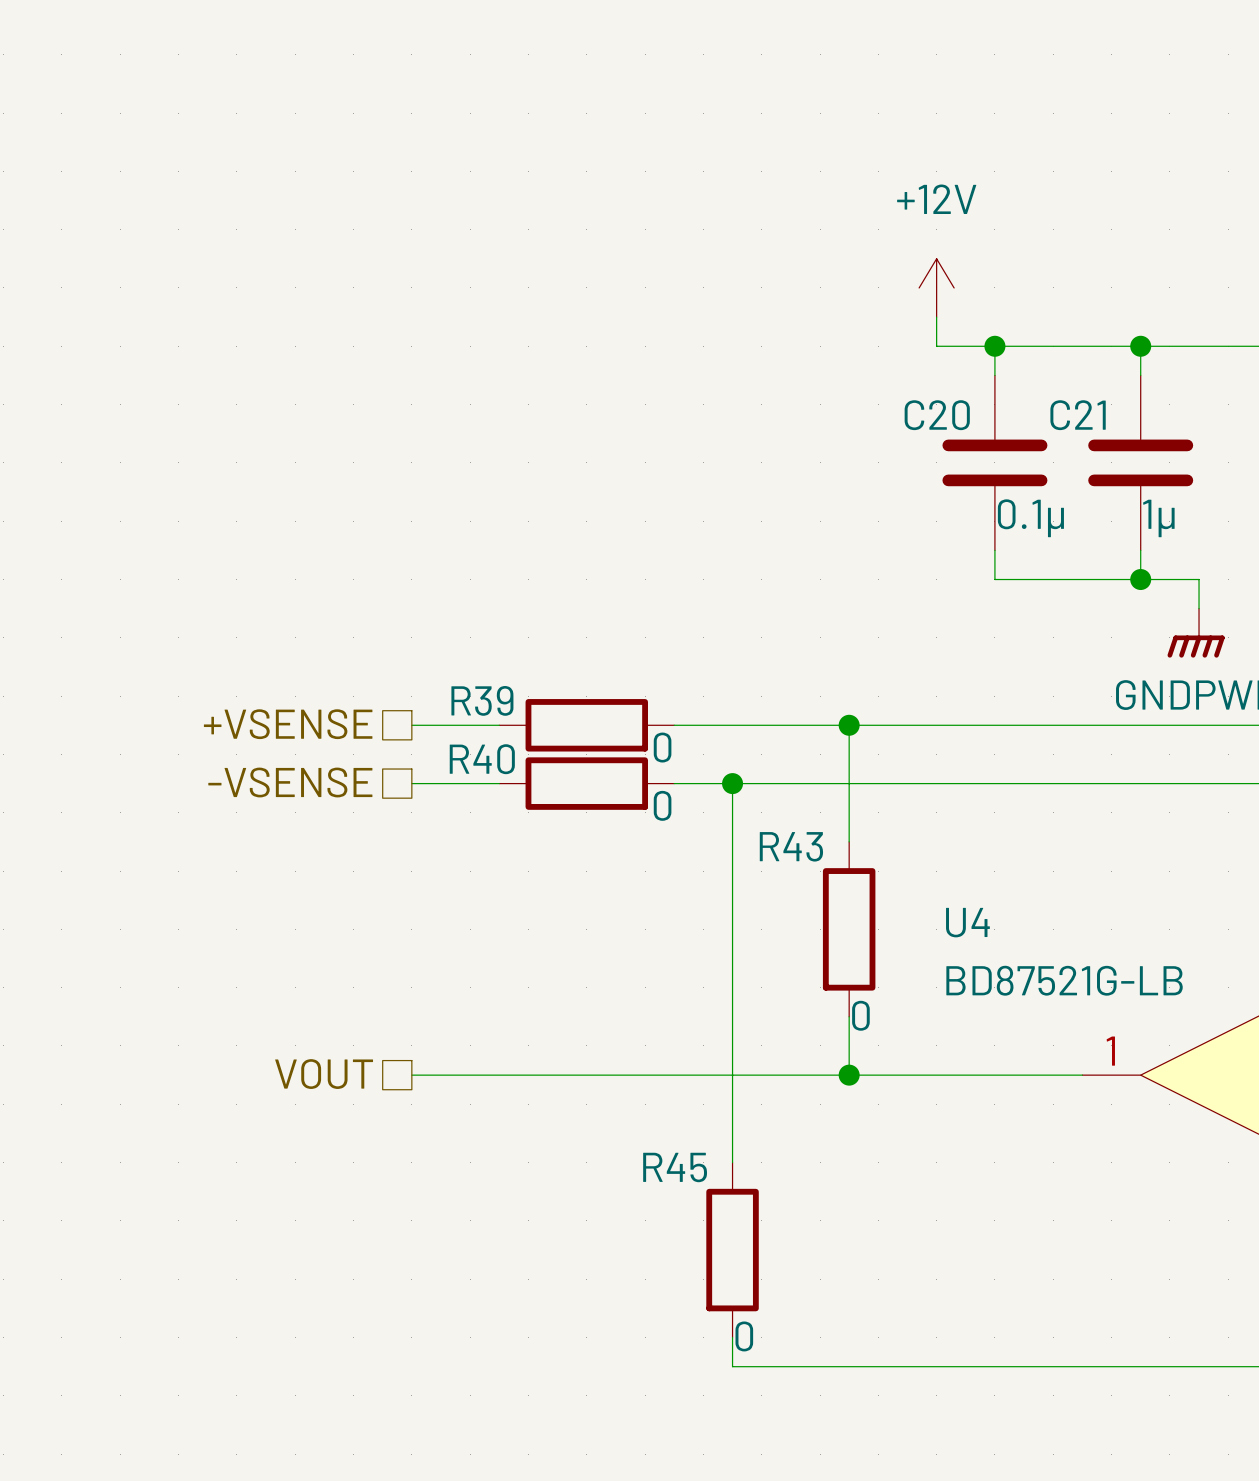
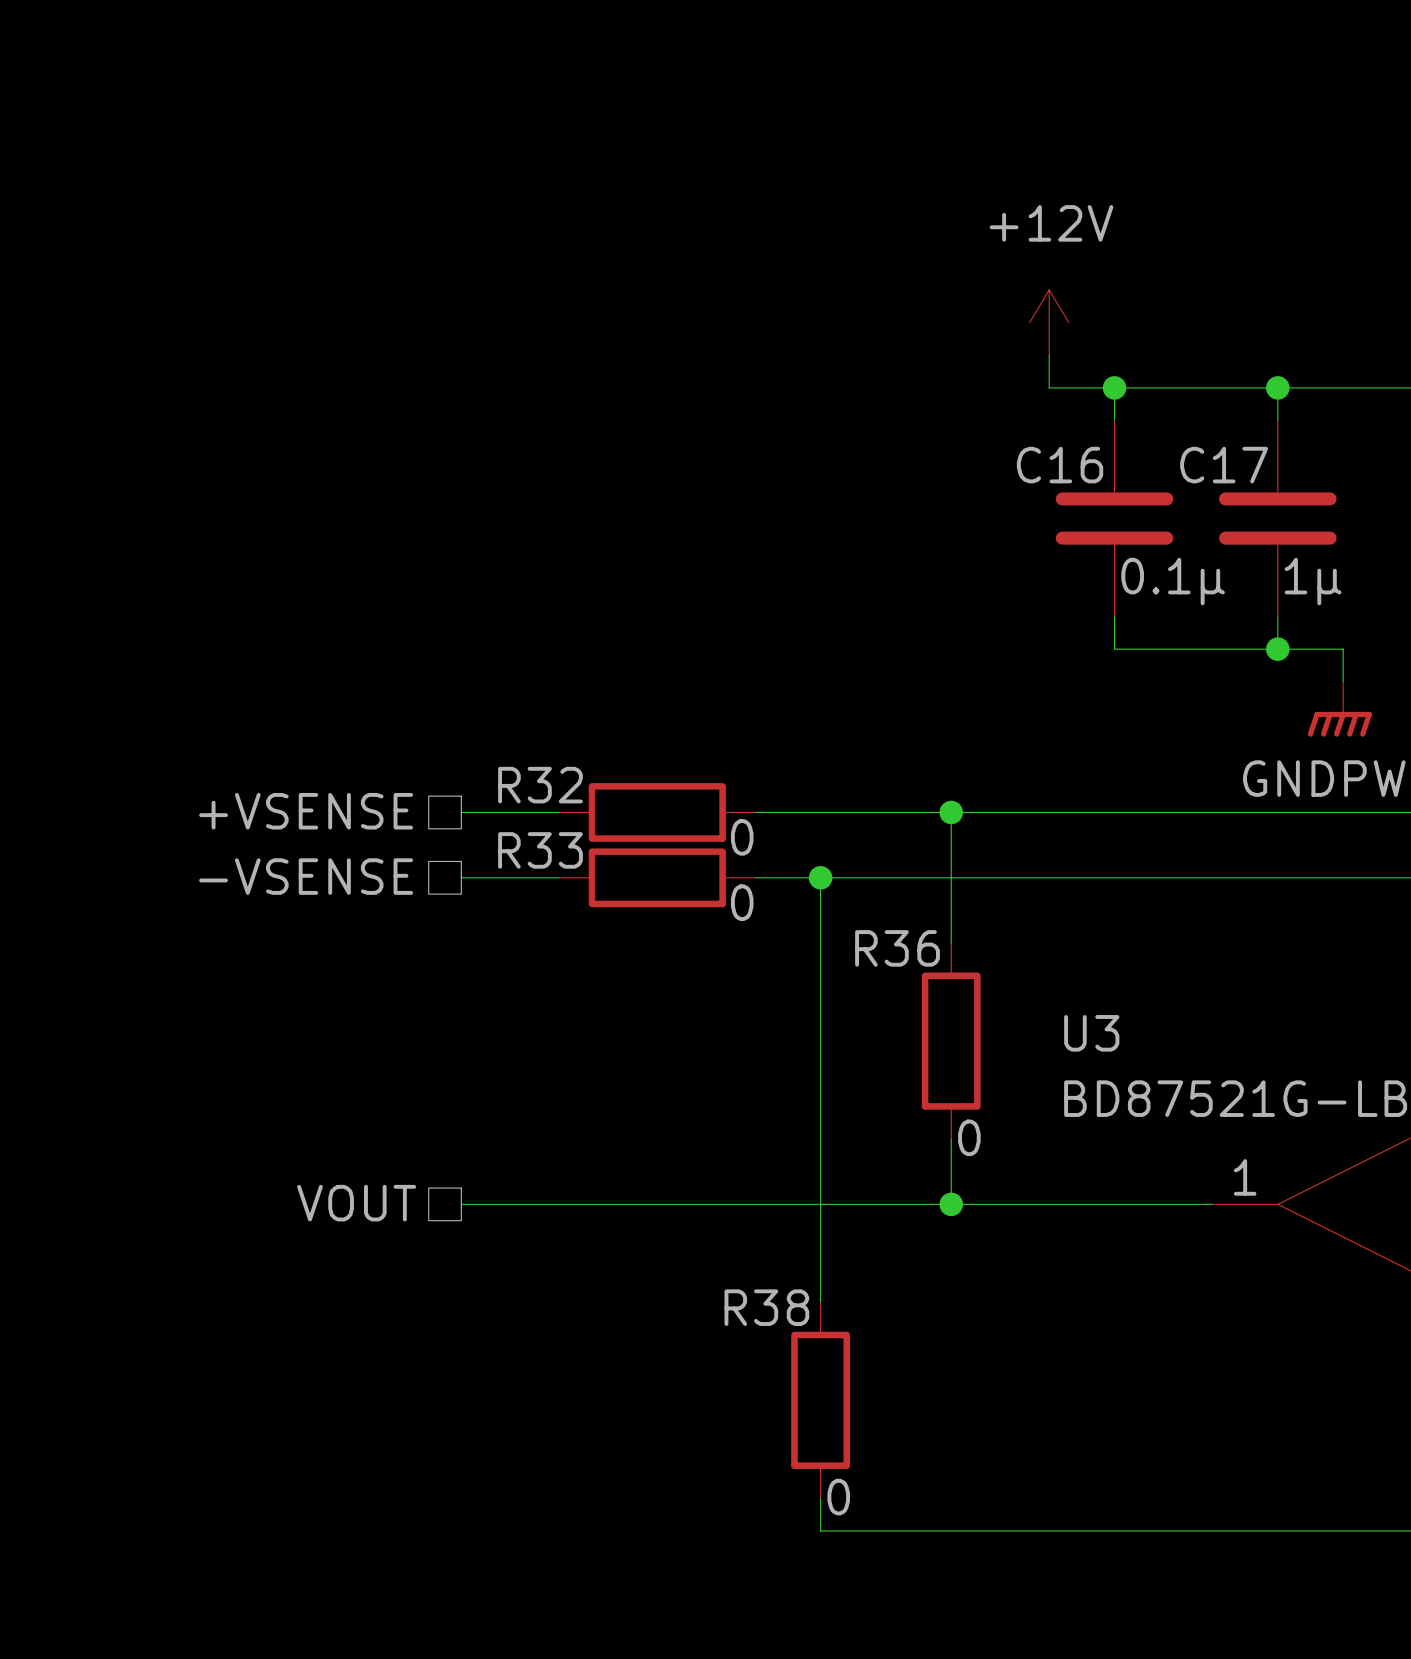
C20 name: C20 (937, 415) -> C16 (1060, 465)
C21 name: C21 (1078, 415) -> C17 (1224, 465)
R39 name: R39 (482, 700) -> R32 (540, 785)
R40 name: R40 (482, 759) -> R33 (540, 850)
R43 name: R43 (791, 846) -> R36 (897, 948)
U4 name: U4 (967, 922) -> U3 (1091, 1033)
R45 name: R45 (675, 1167) -> R38 (766, 1307)

